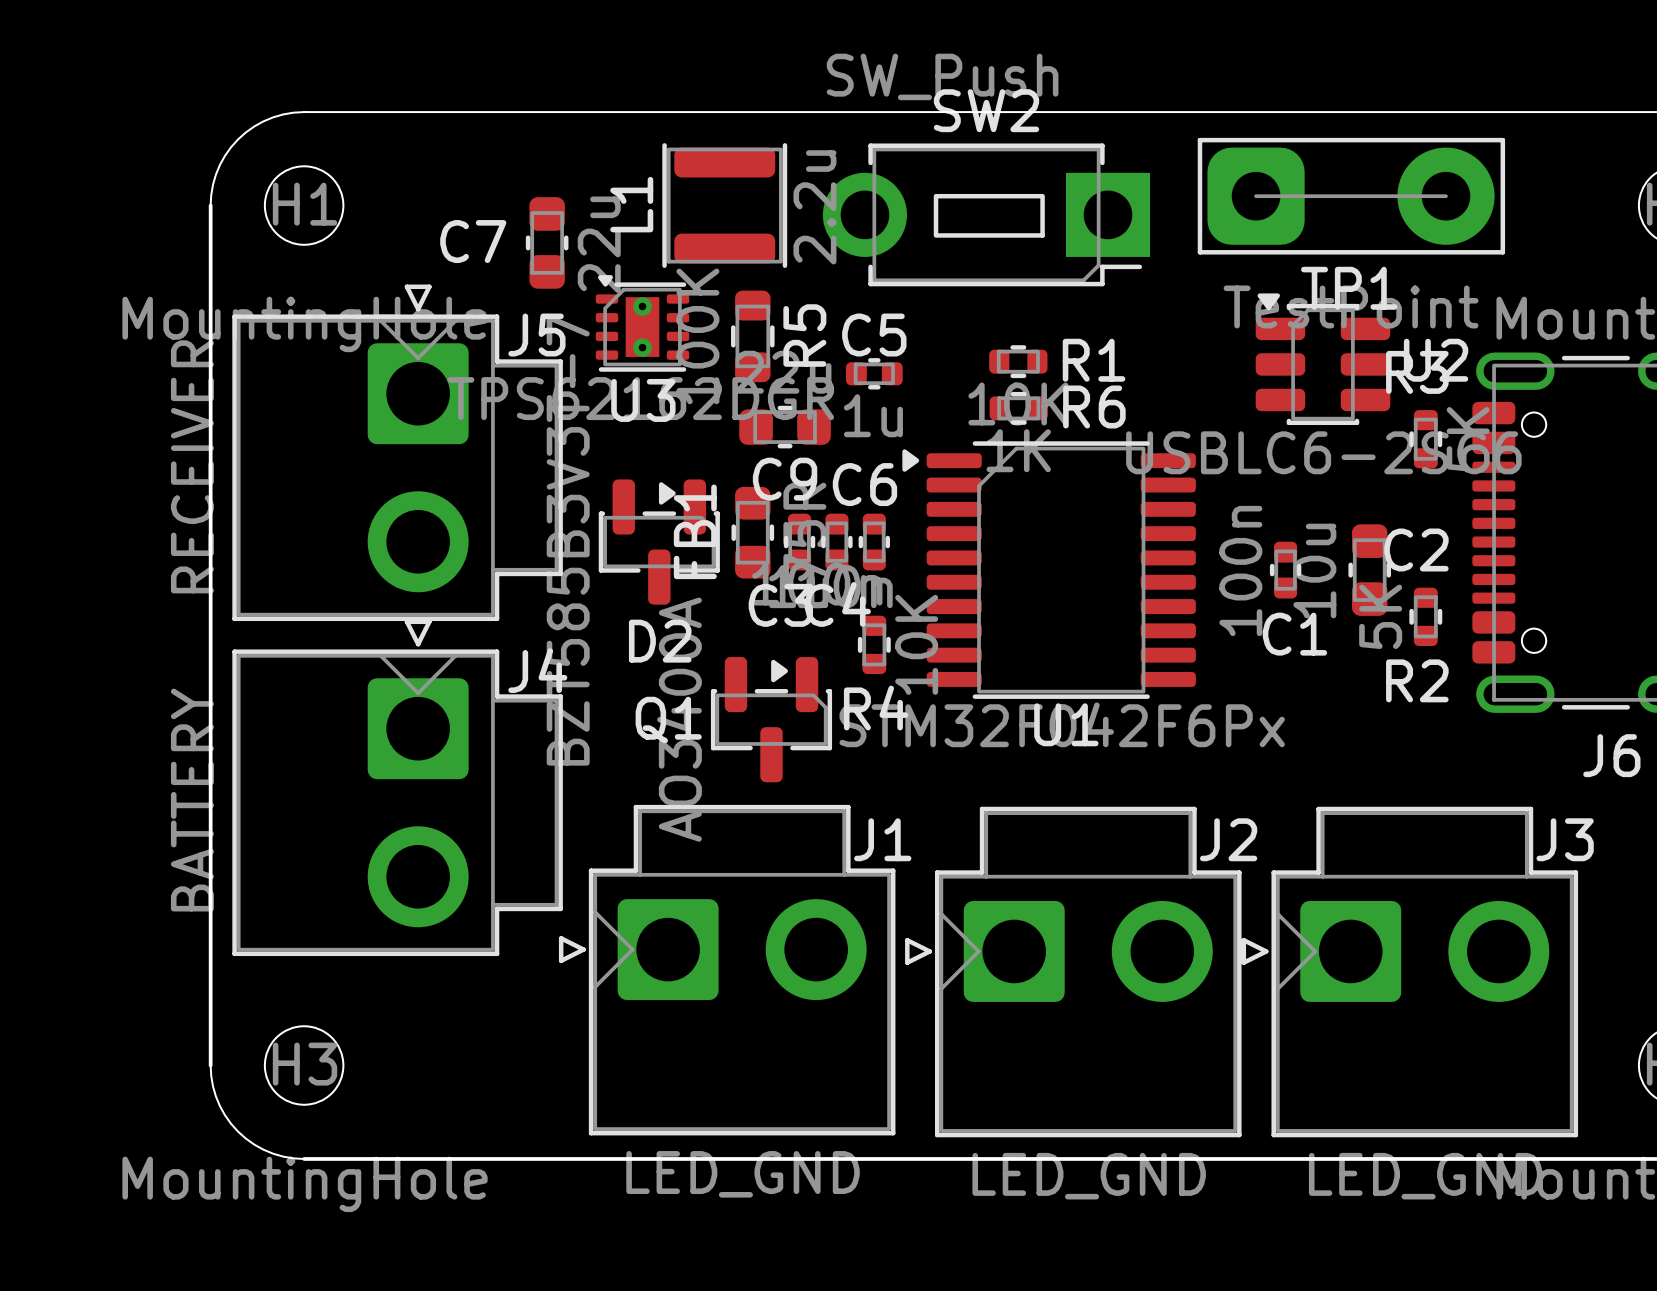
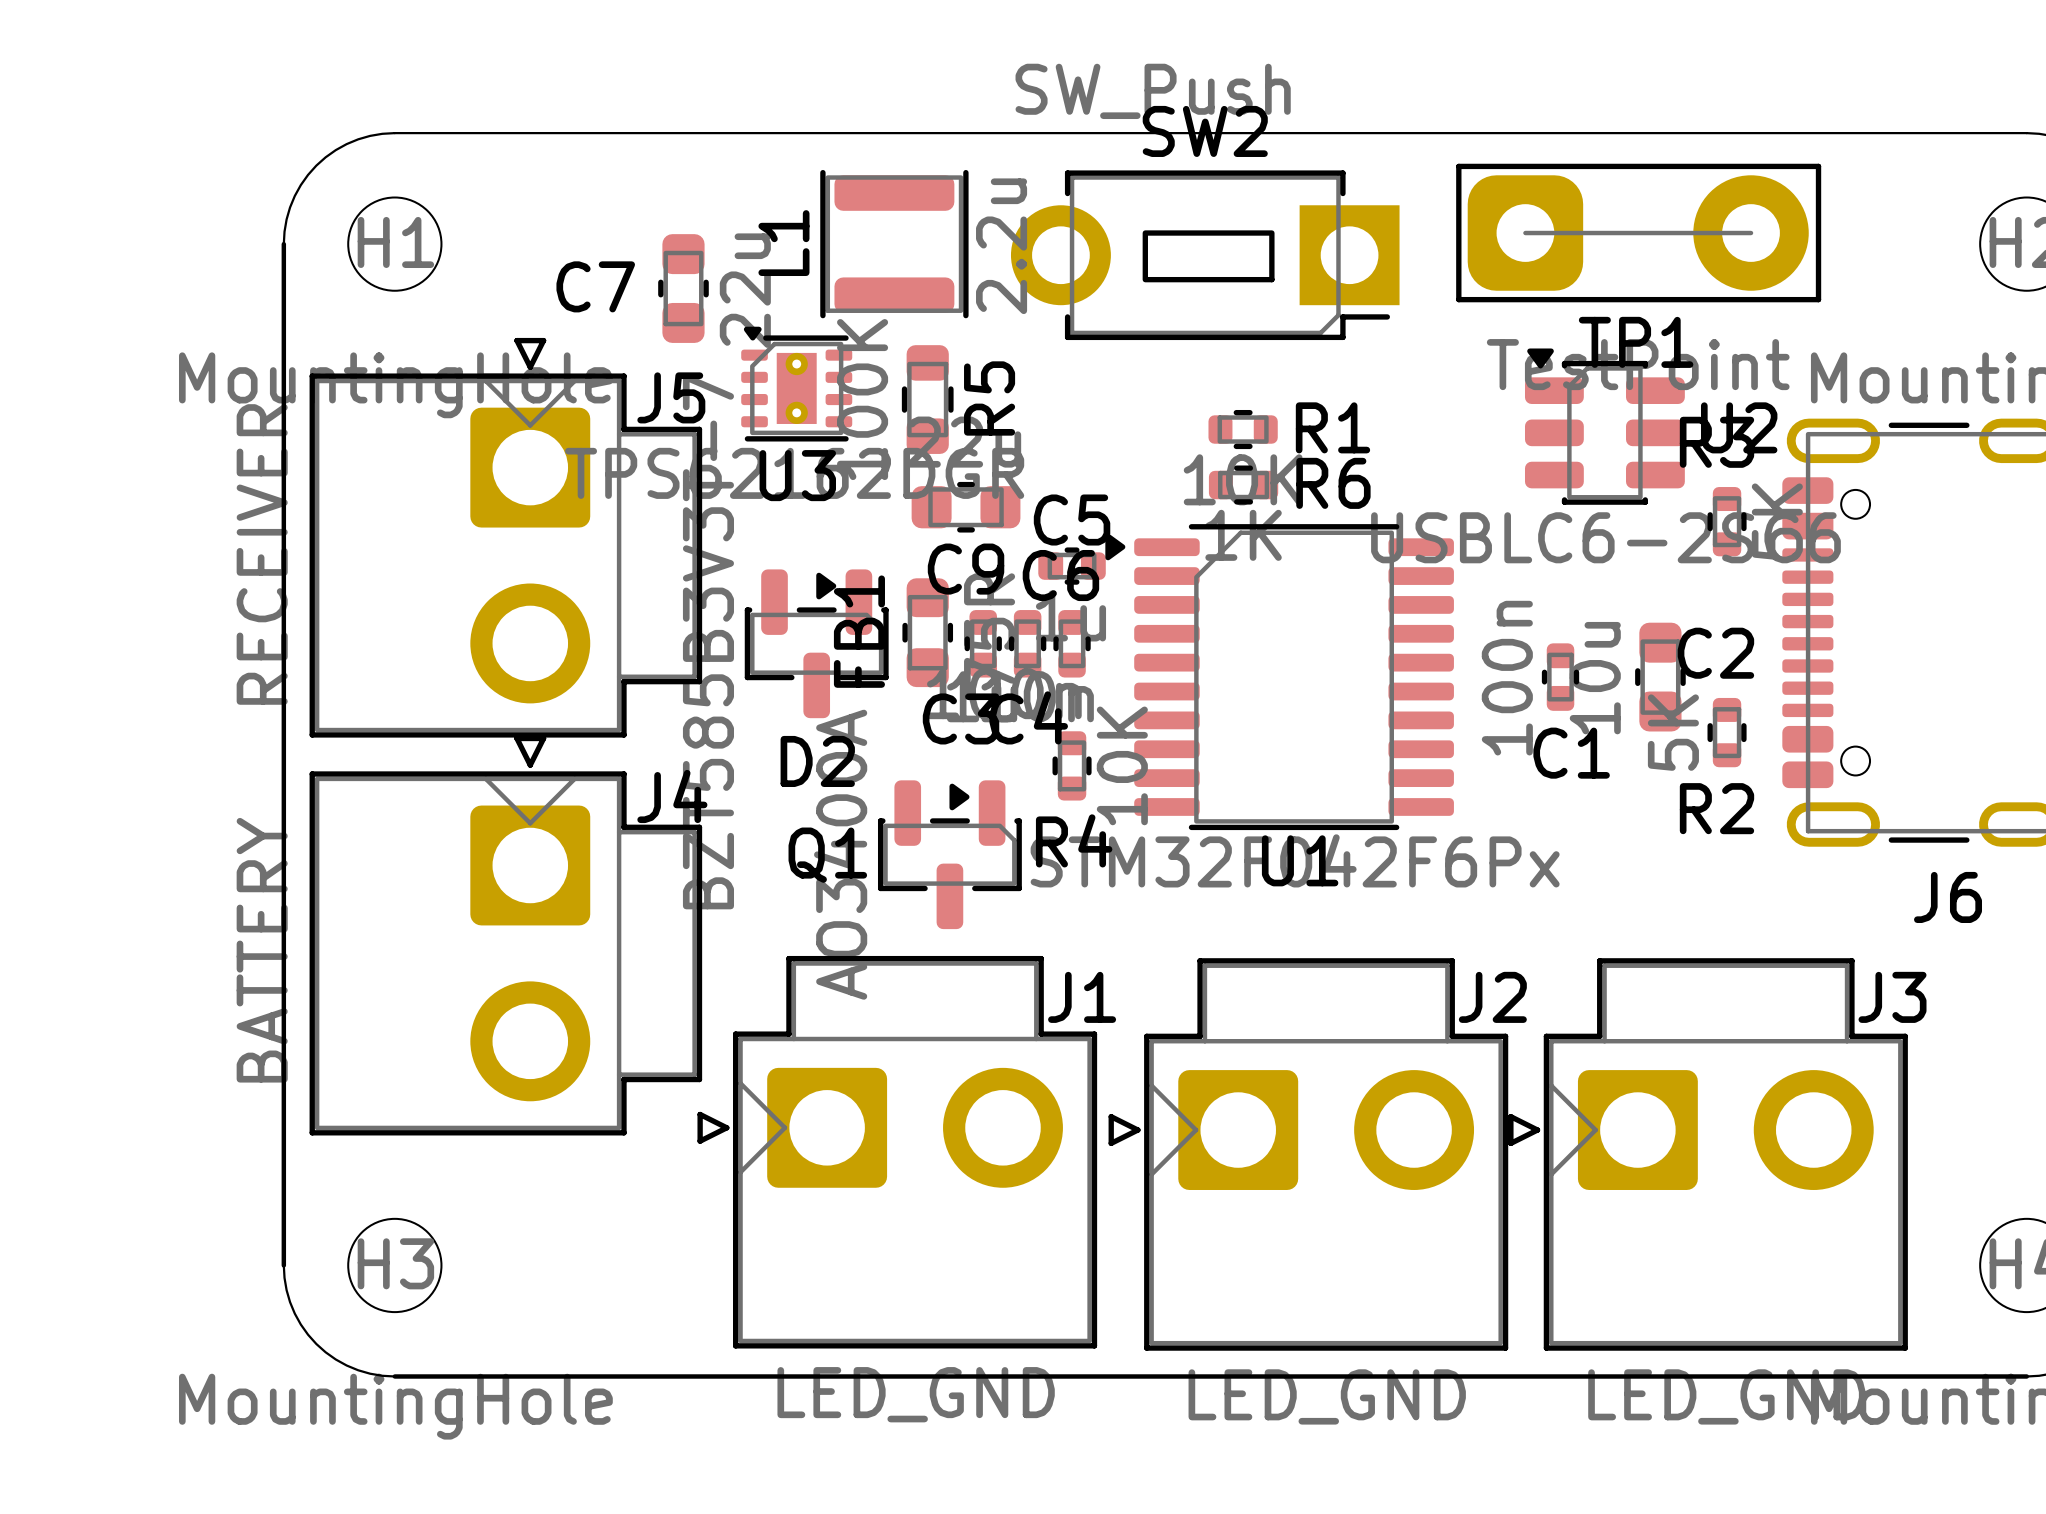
C5 position: (874, 373) -> (1072, 566)

